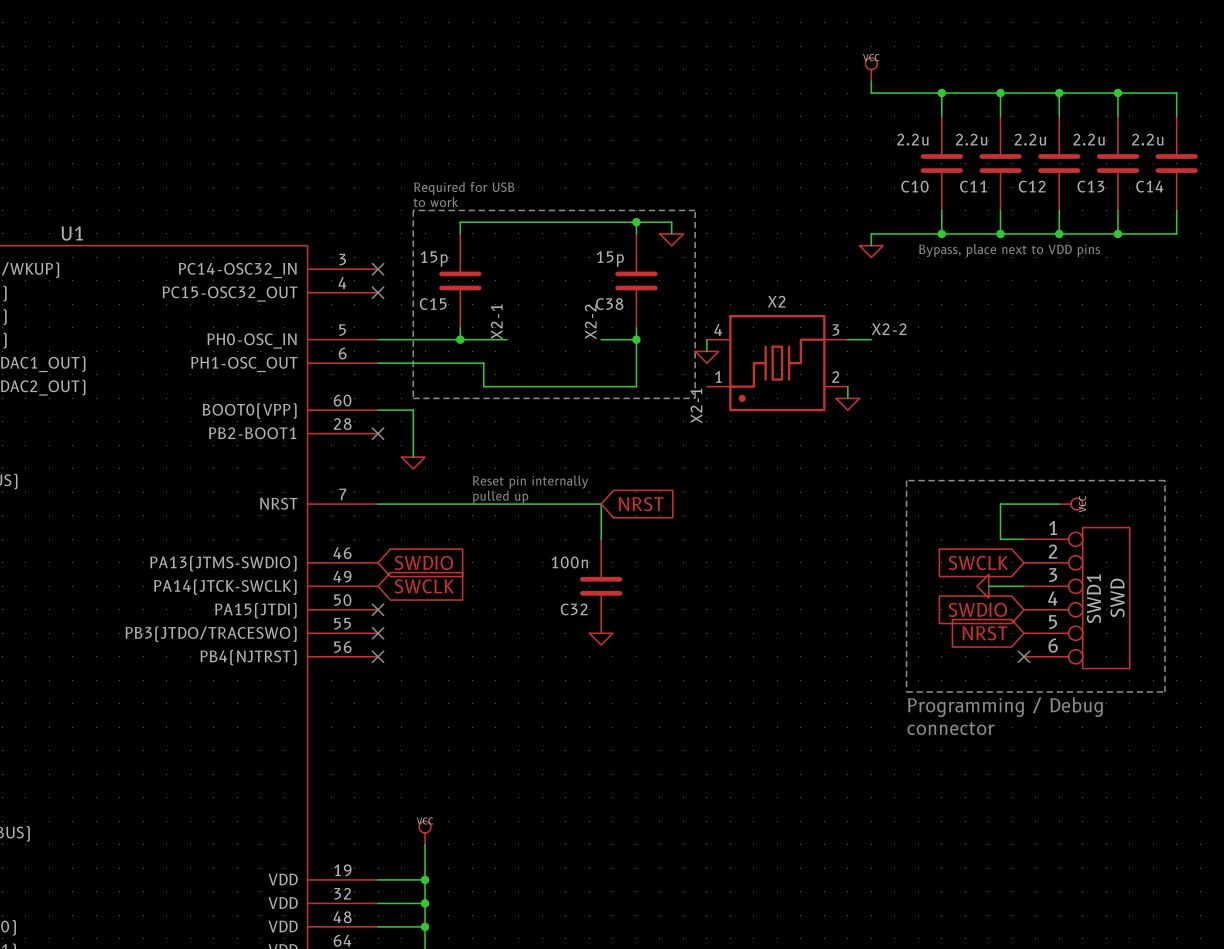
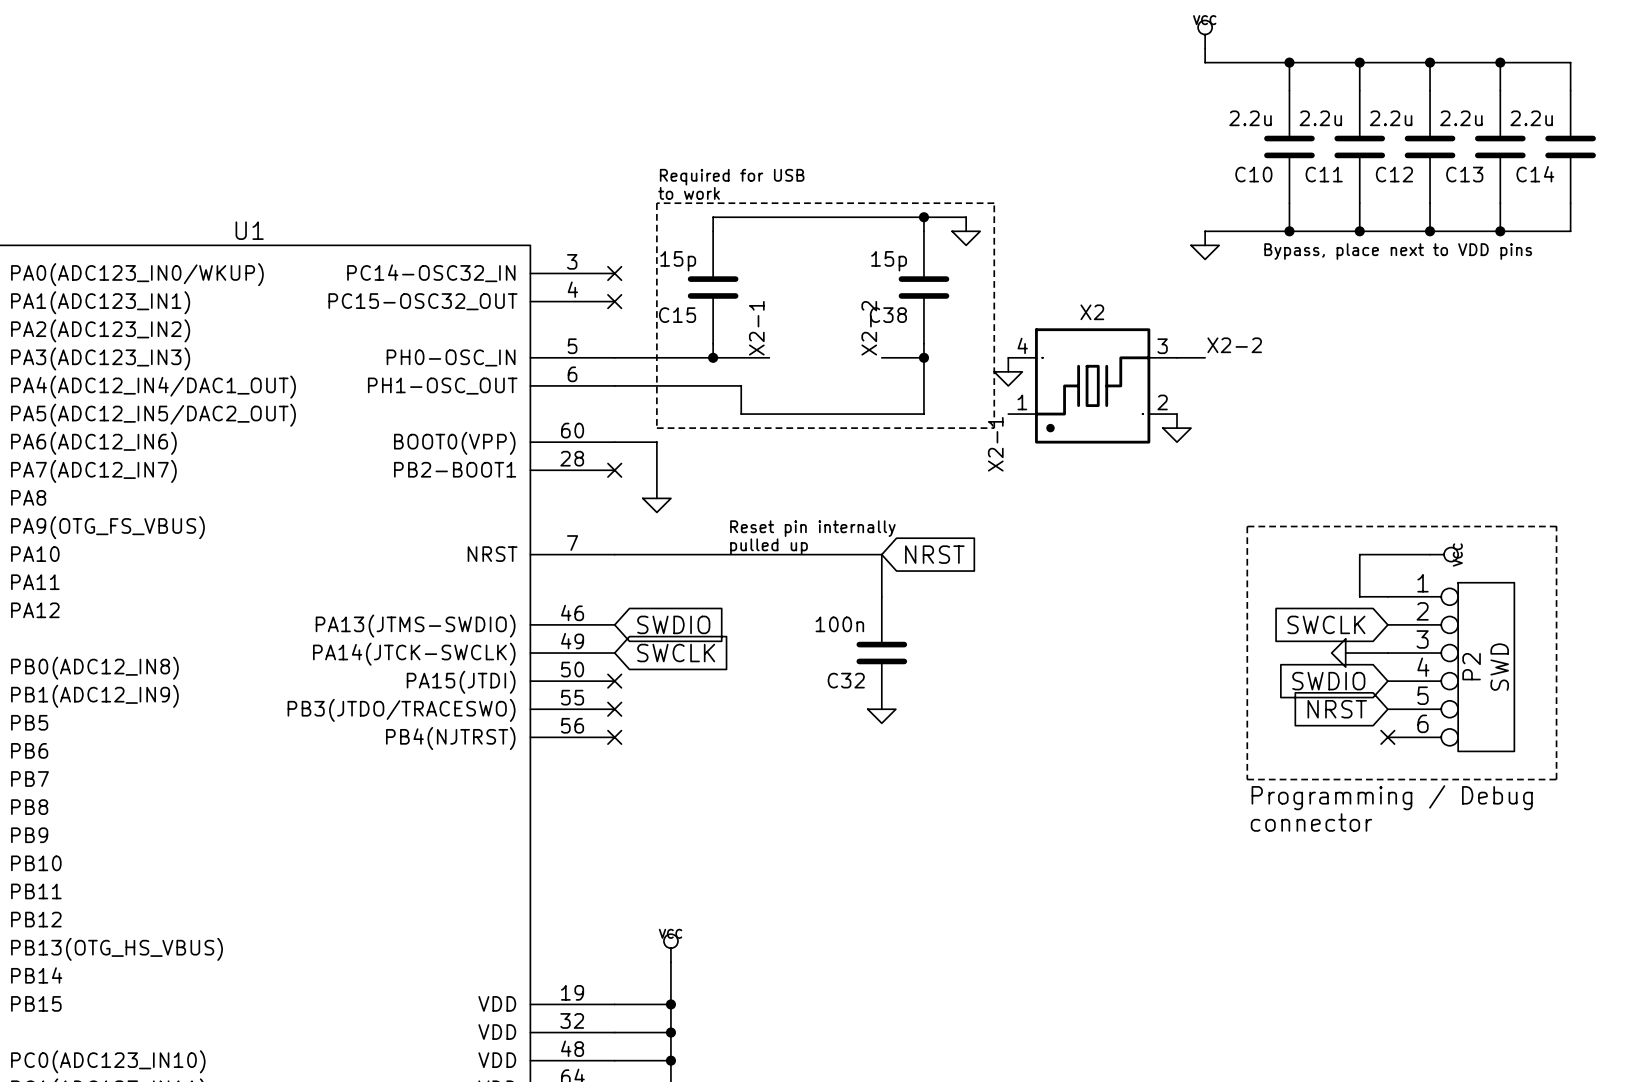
SWD1 name: SWD1 (1094, 598) -> P2 (1471, 666)

